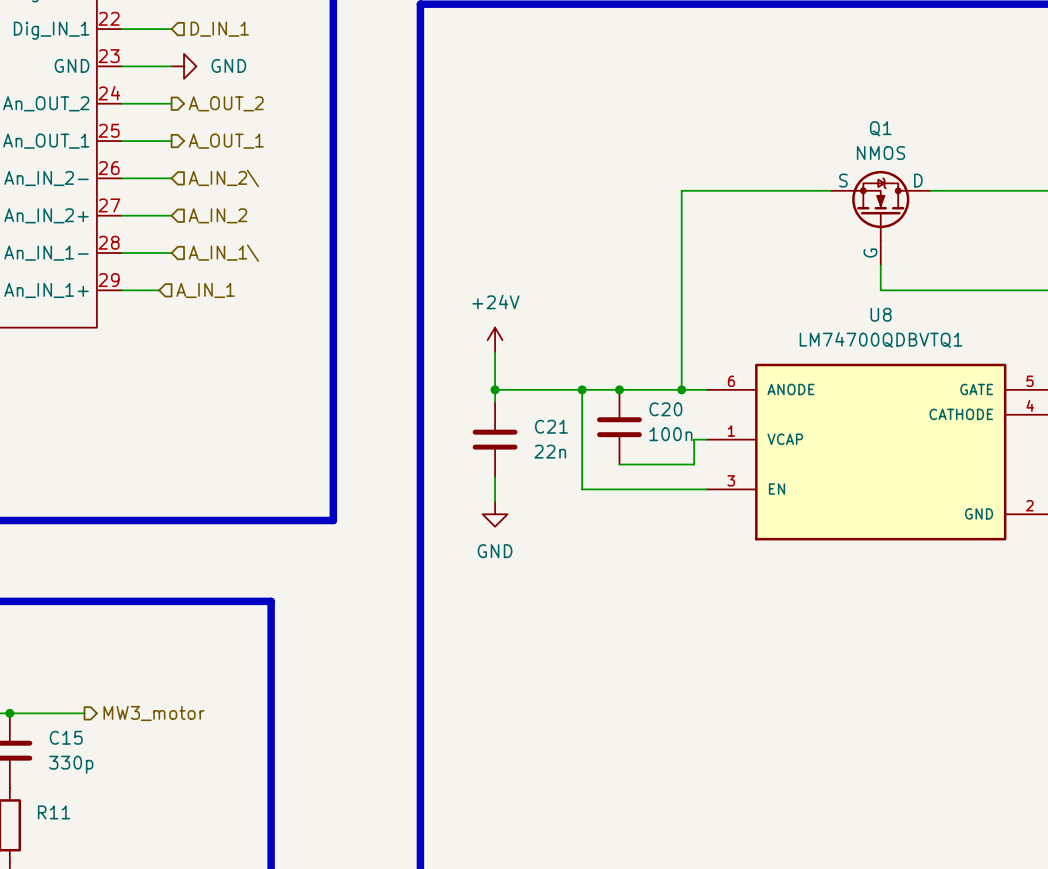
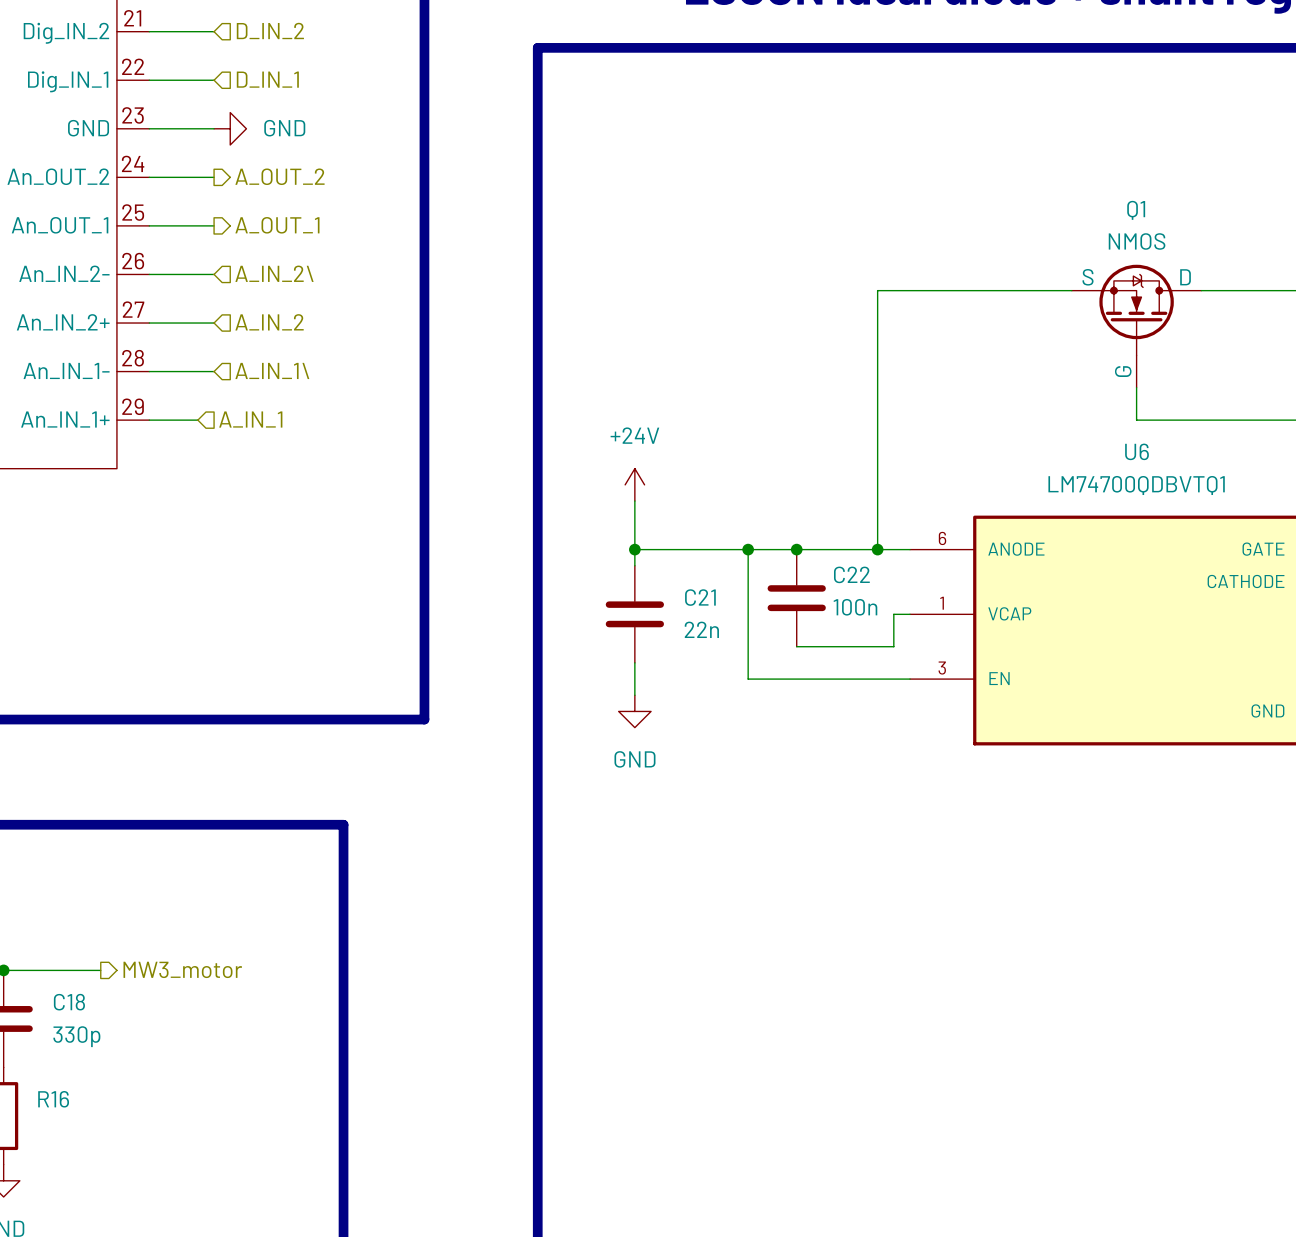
U8 name: U8 (881, 314) -> U6 (1137, 451)
C20 name: C20 (665, 409) -> C22 (851, 574)
C15 name: C15 (66, 737) -> C18 (69, 1002)
R11 name: R11 (54, 812) -> R16 (53, 1099)

